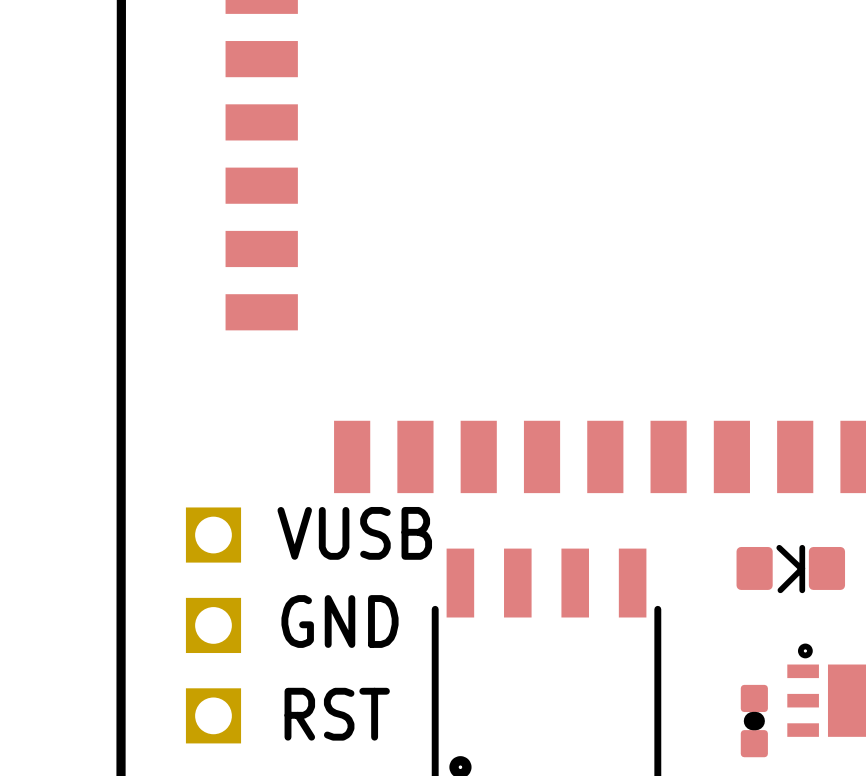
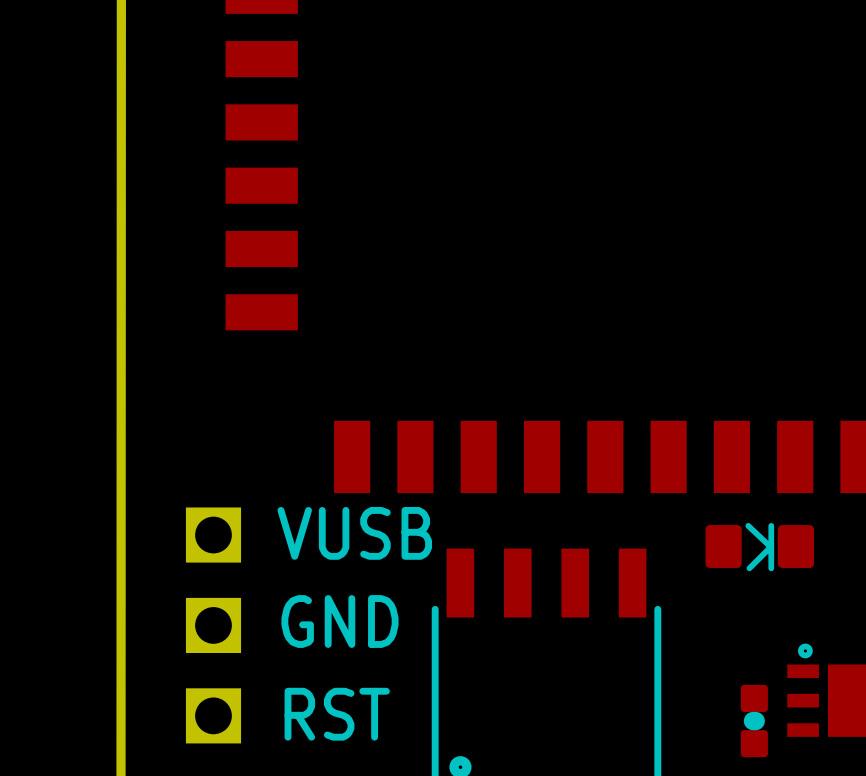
part position: (790, 569) -> (759, 547)

